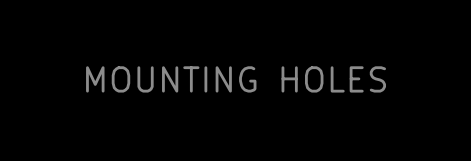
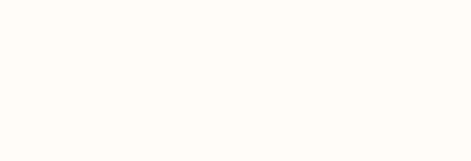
text: MOUNTING HOLES (236, 79) -> none

